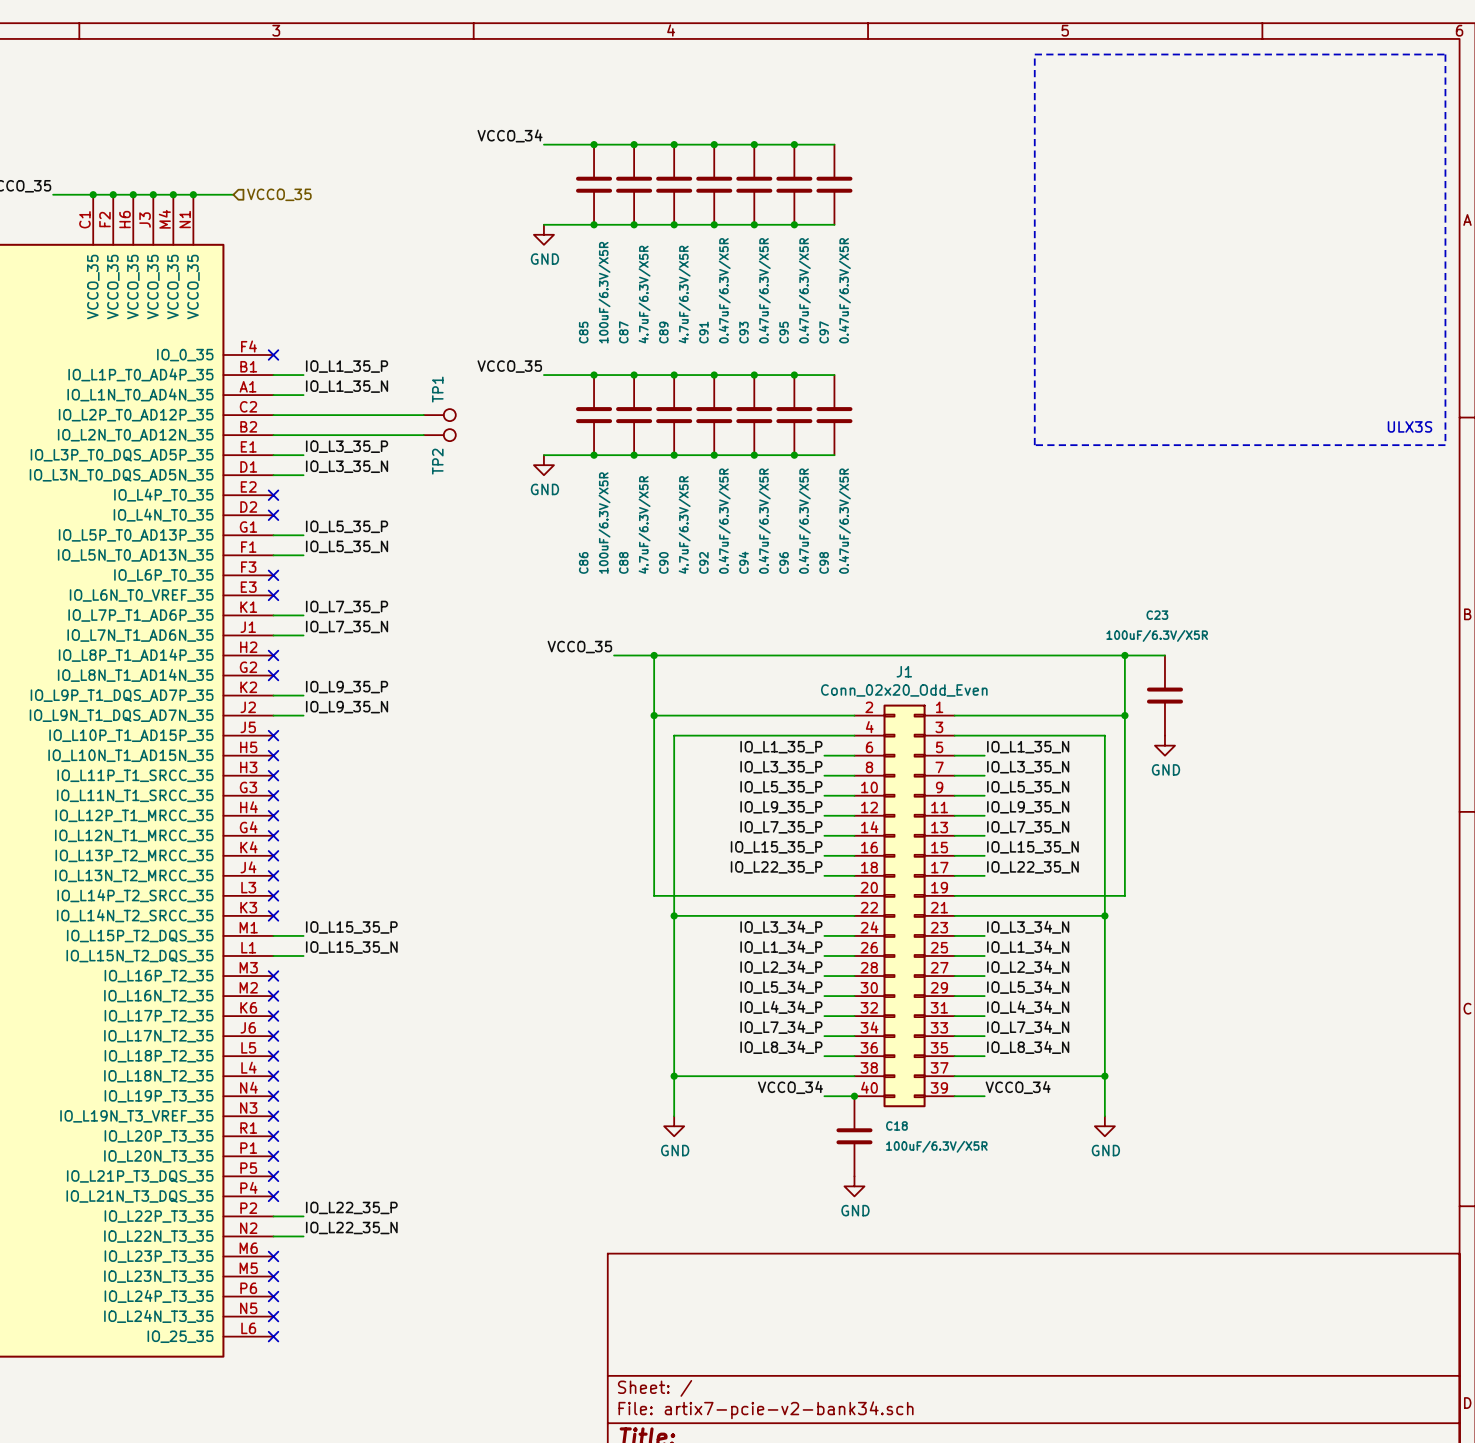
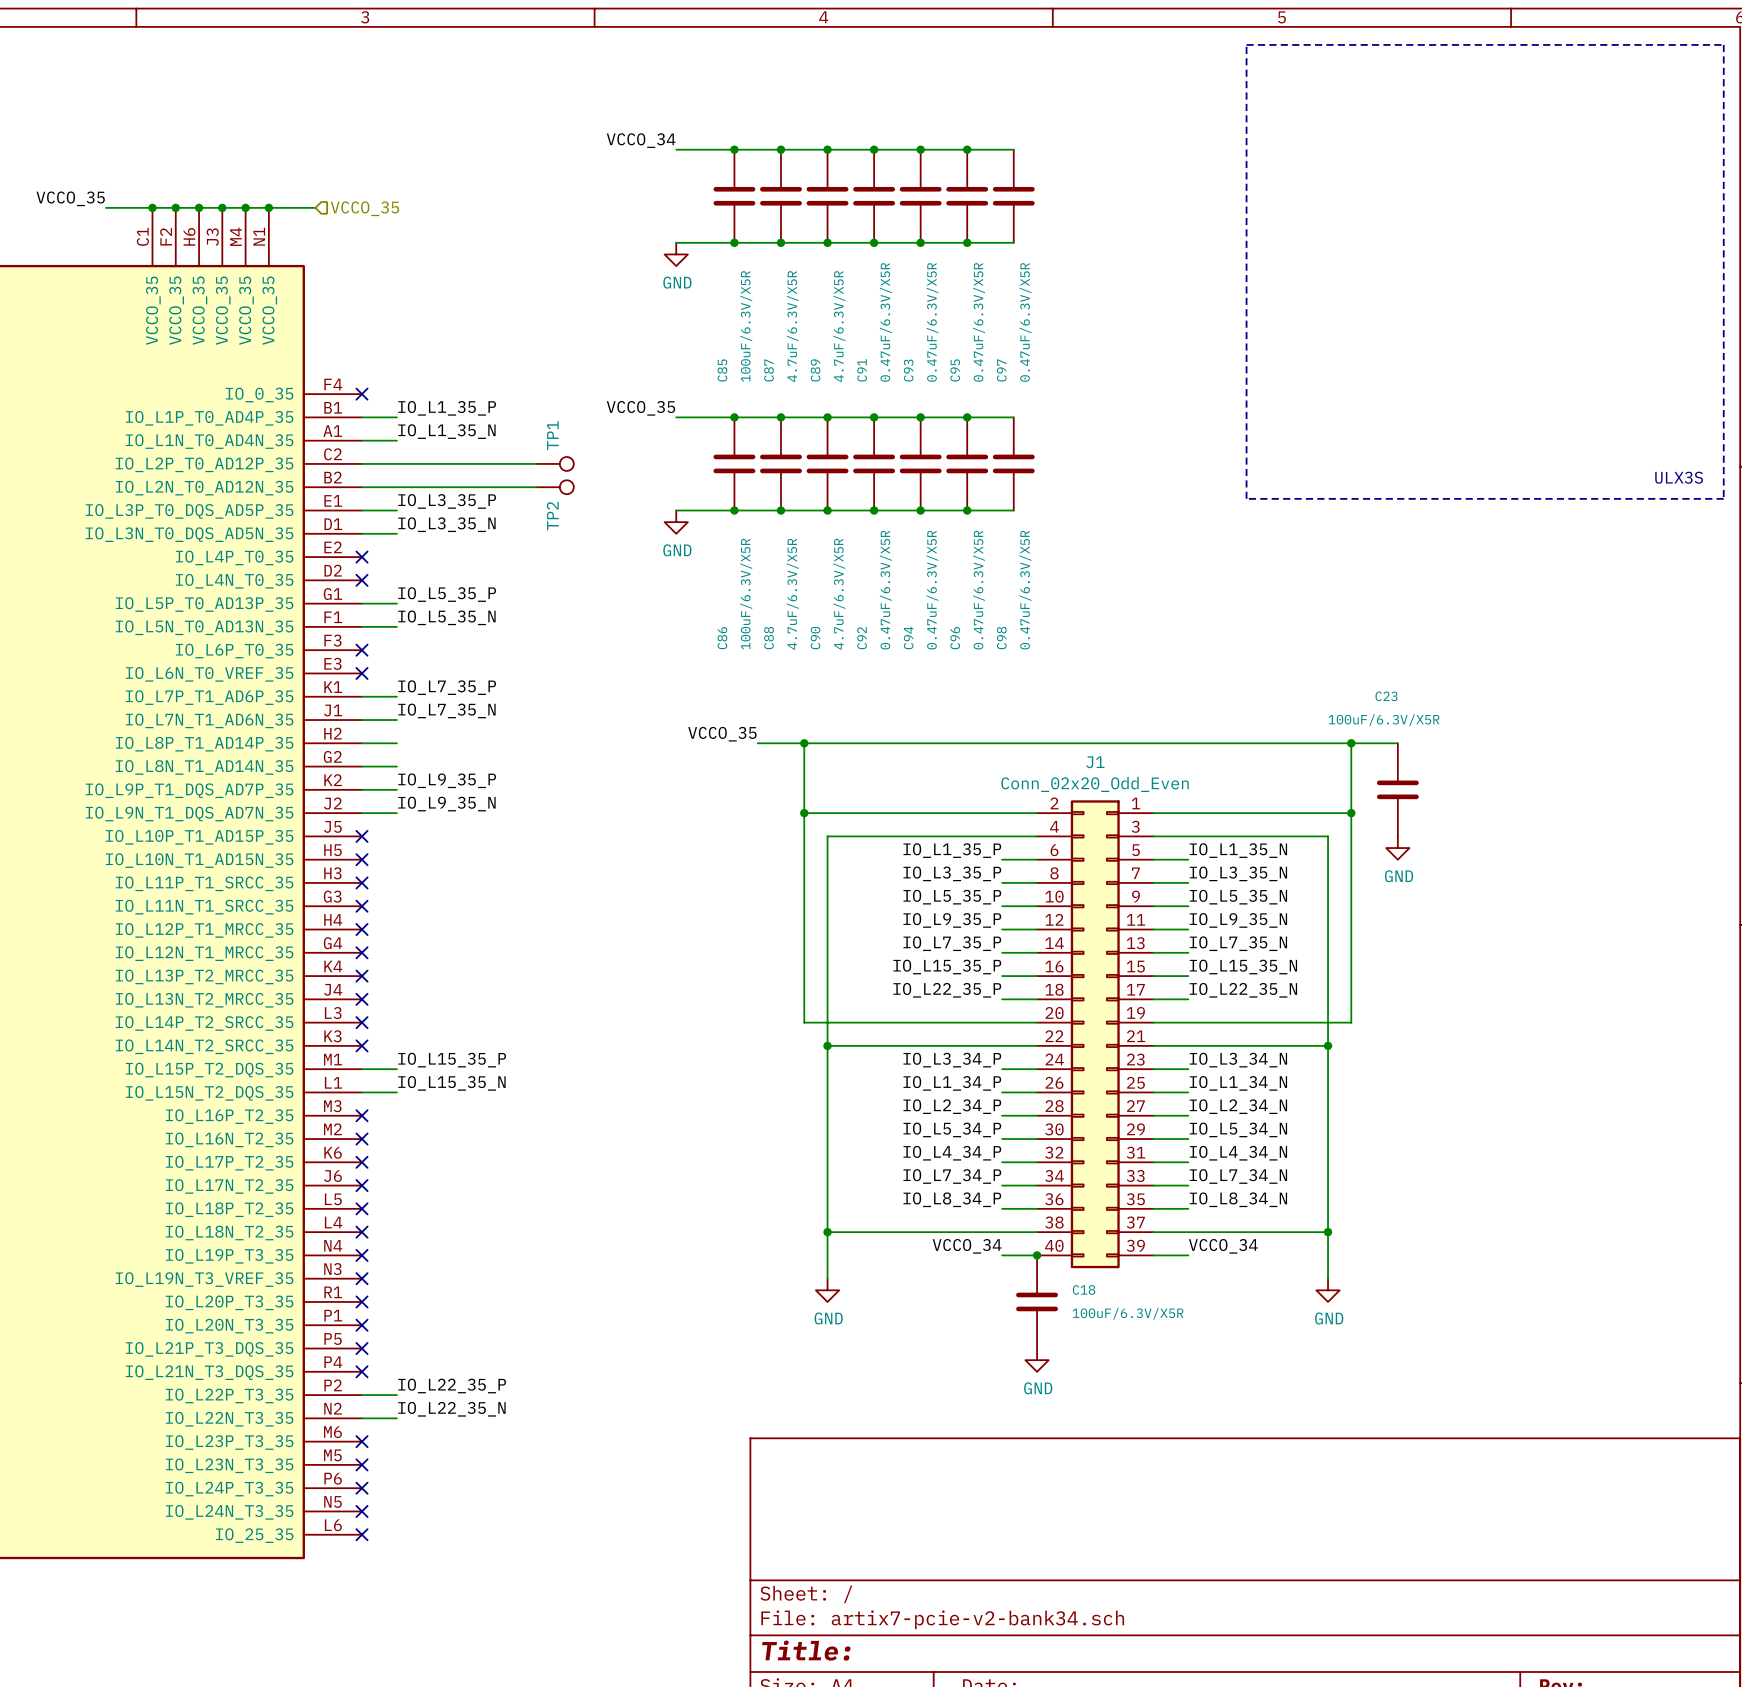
wire: none -> (361, 743) (396, 743)
no-connect mark: (273, 655) -> none
wire: none -> (361, 766) (396, 766)
no-connect mark: (273, 675) -> none

